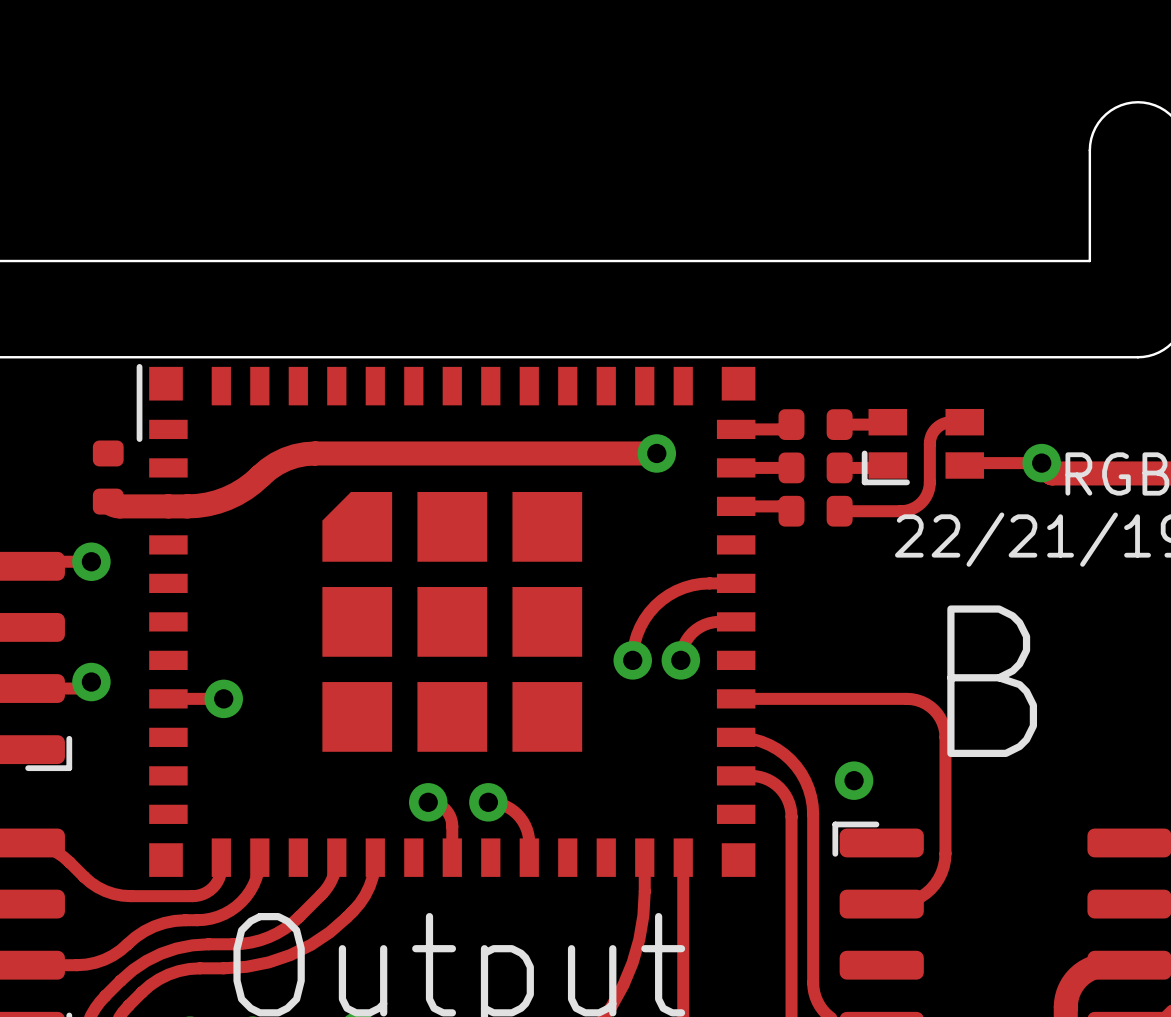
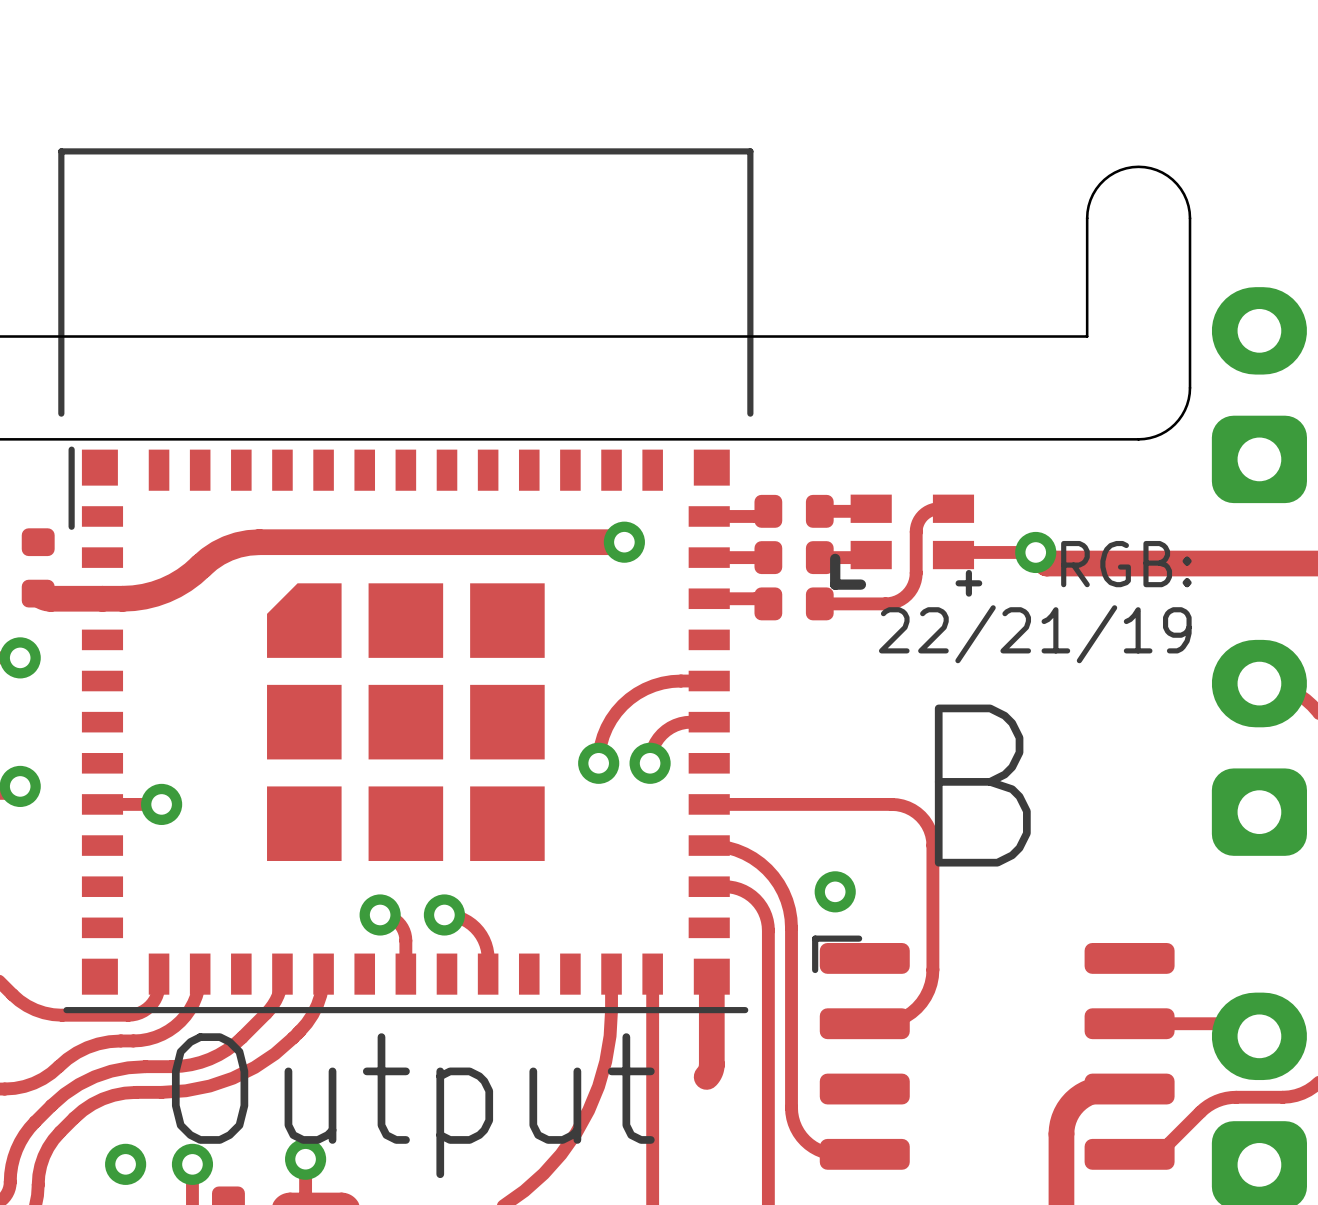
part footprint: [861, 408, 984, 486] -> [830, 494, 983, 597]
part: none -> (405, 580)
part: (446, 620) -> none
track: none -> (711, 976) (711, 1066) (706, 1076)

